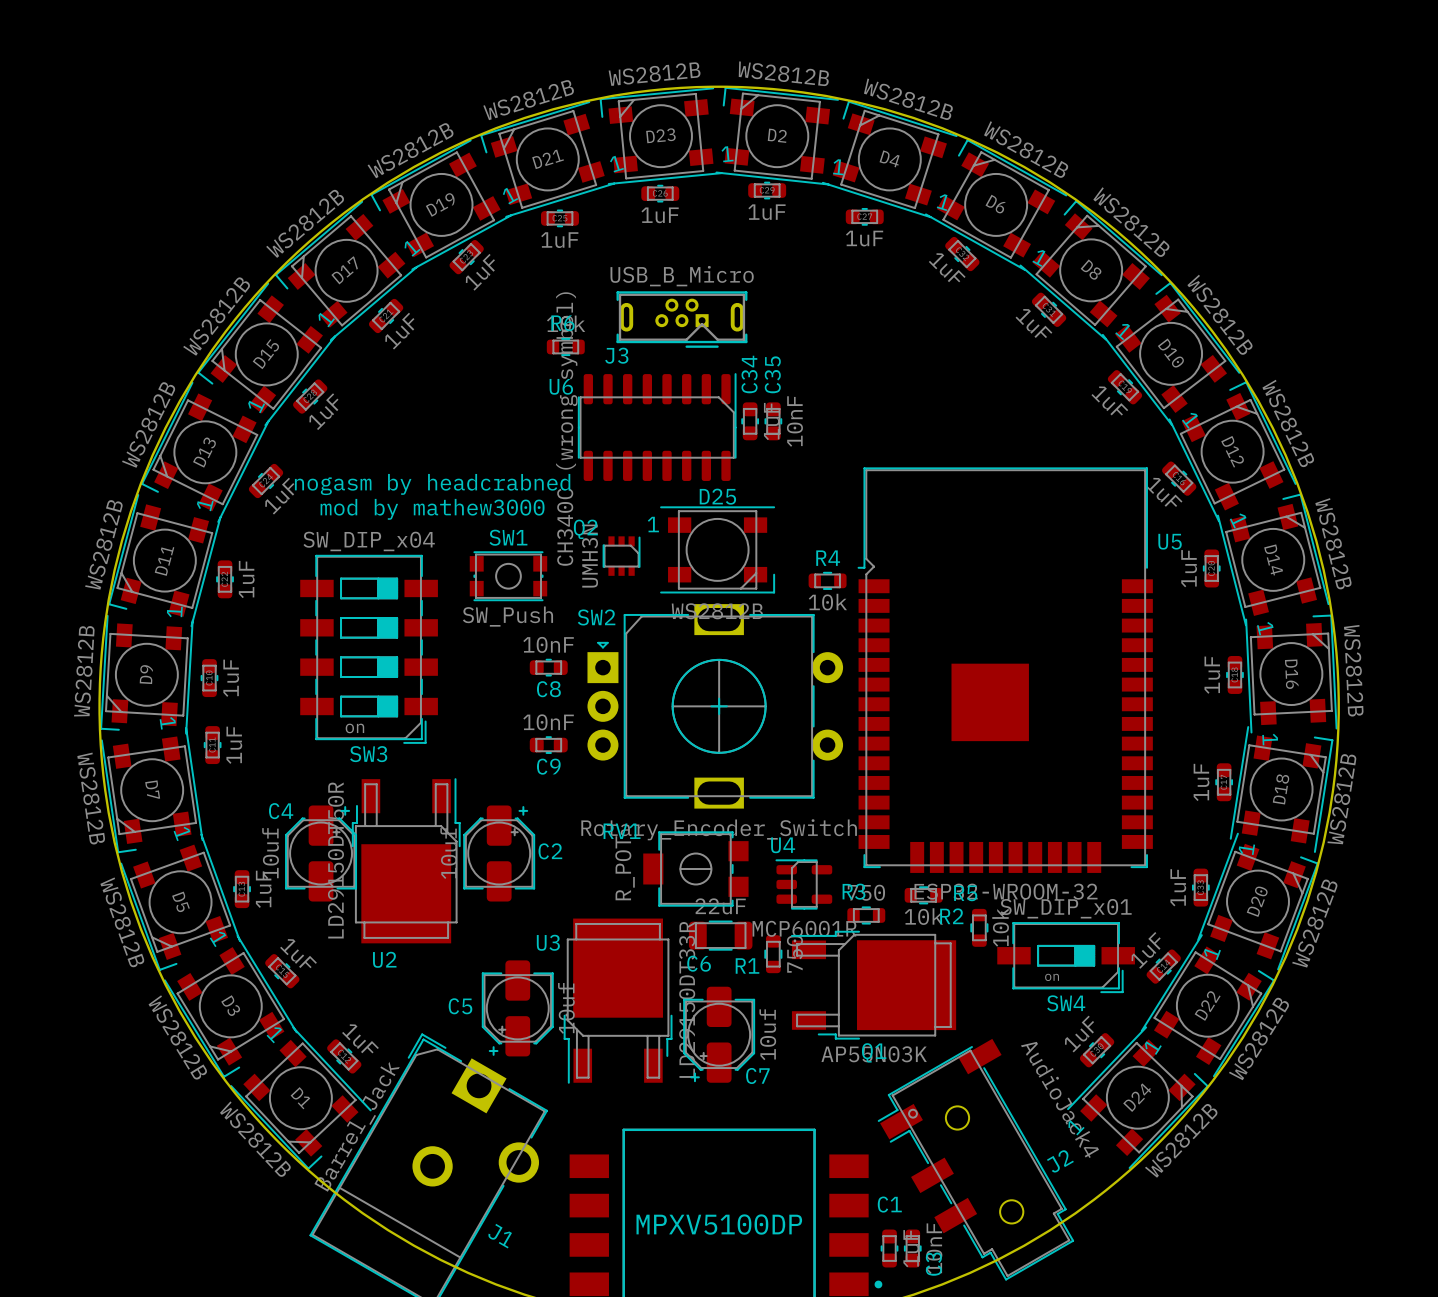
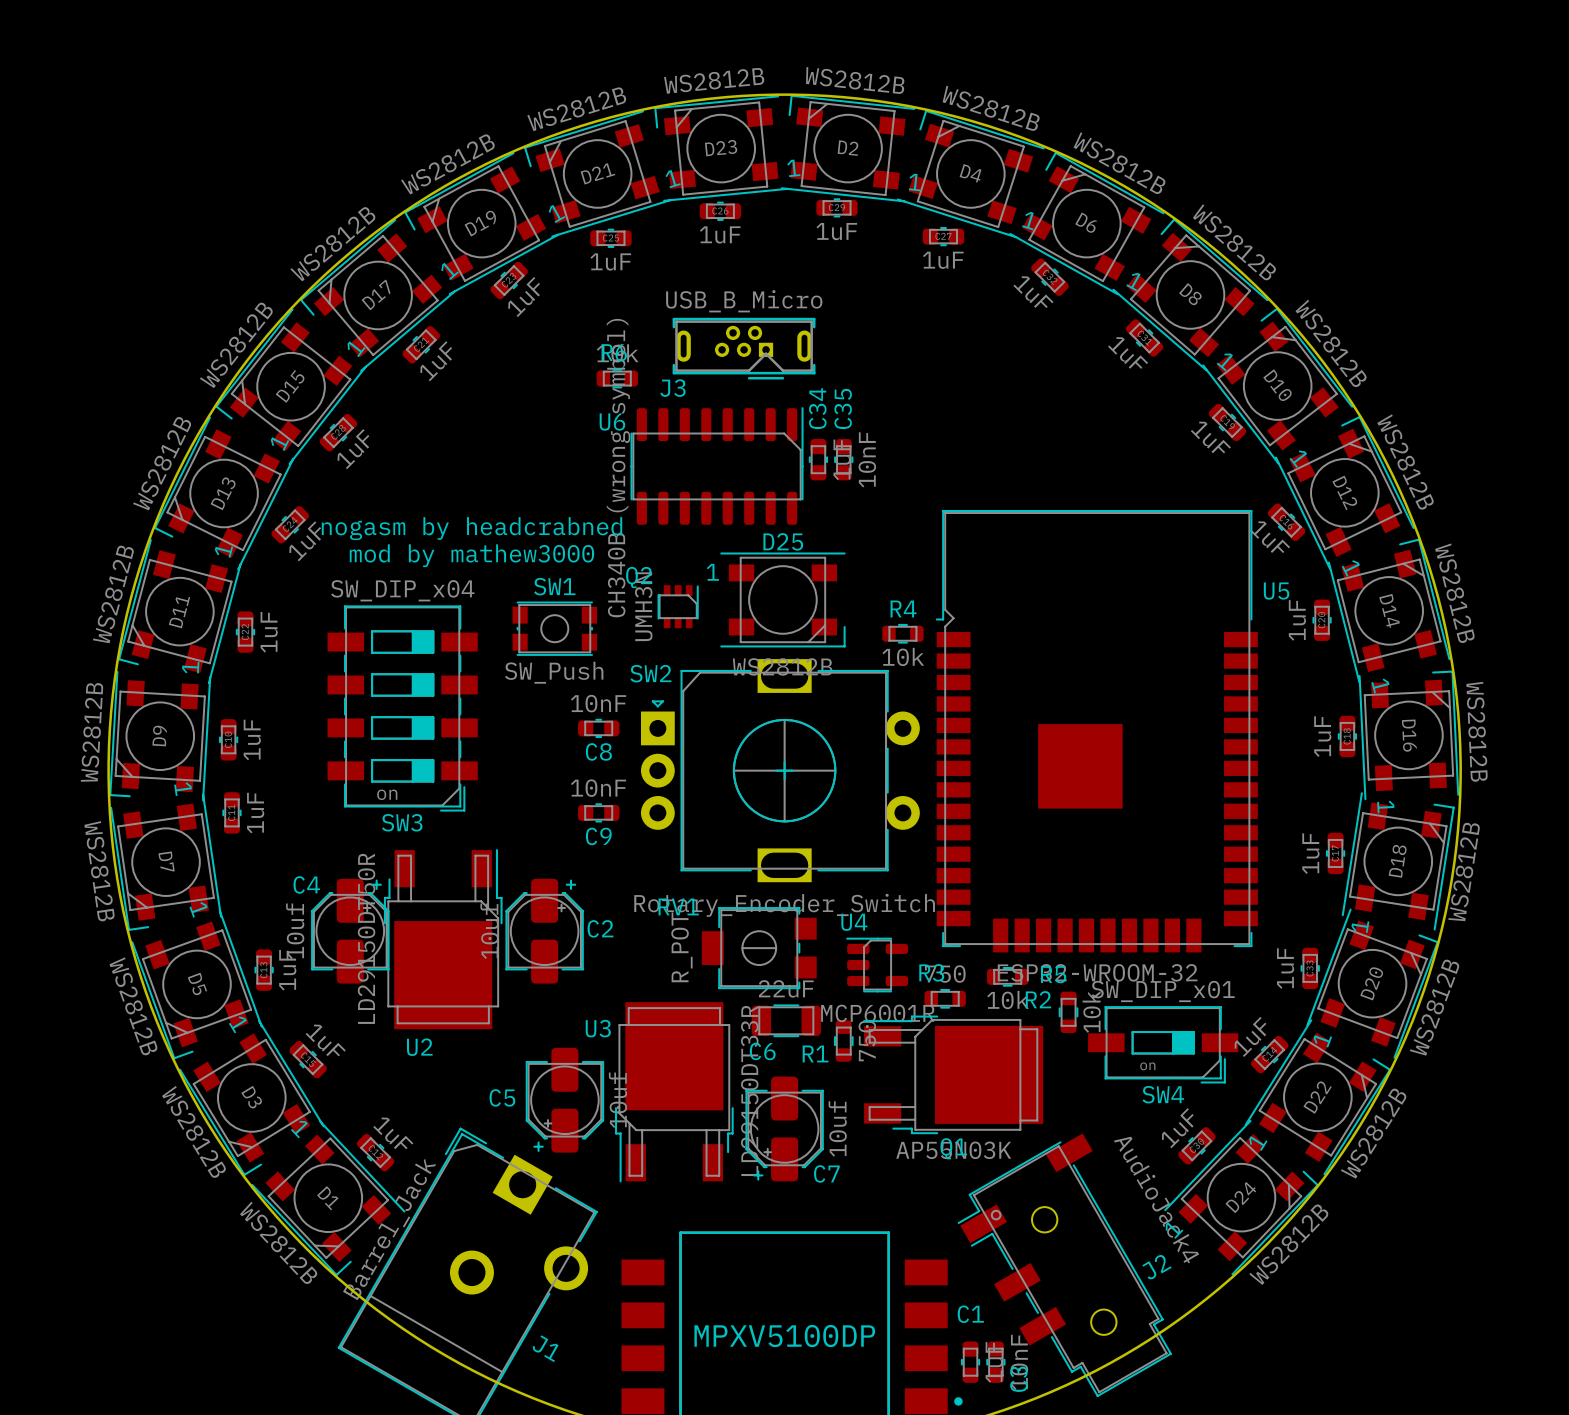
U6 value: CH340C (wrong symbol) (566, 429) -> CH340B (wrong symbol) (618, 468)

